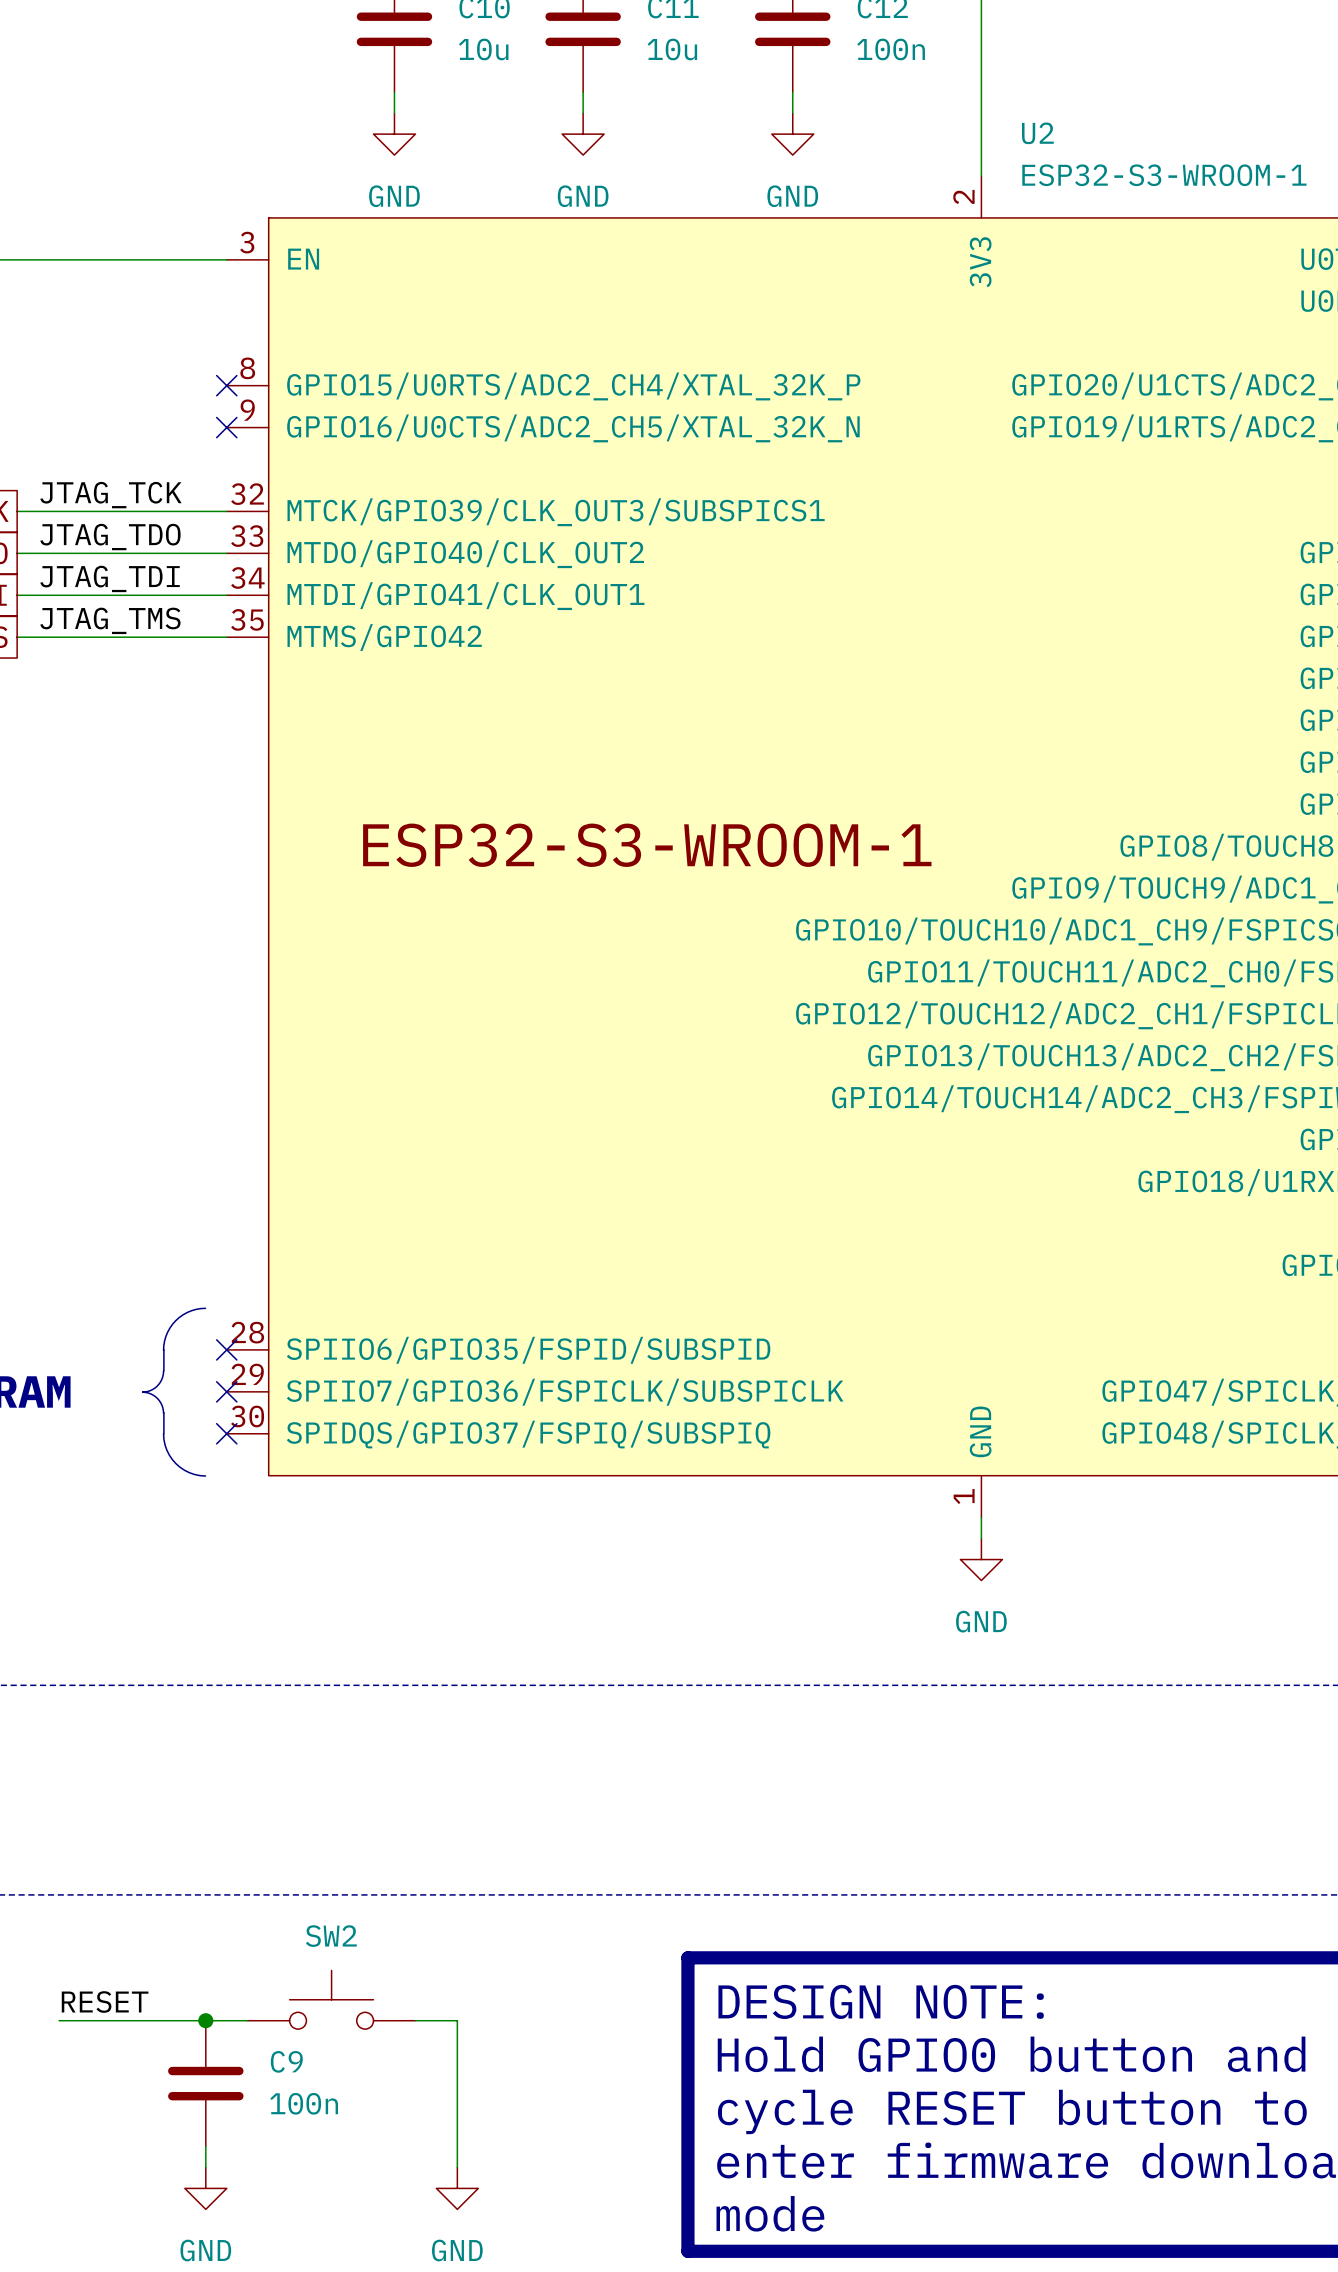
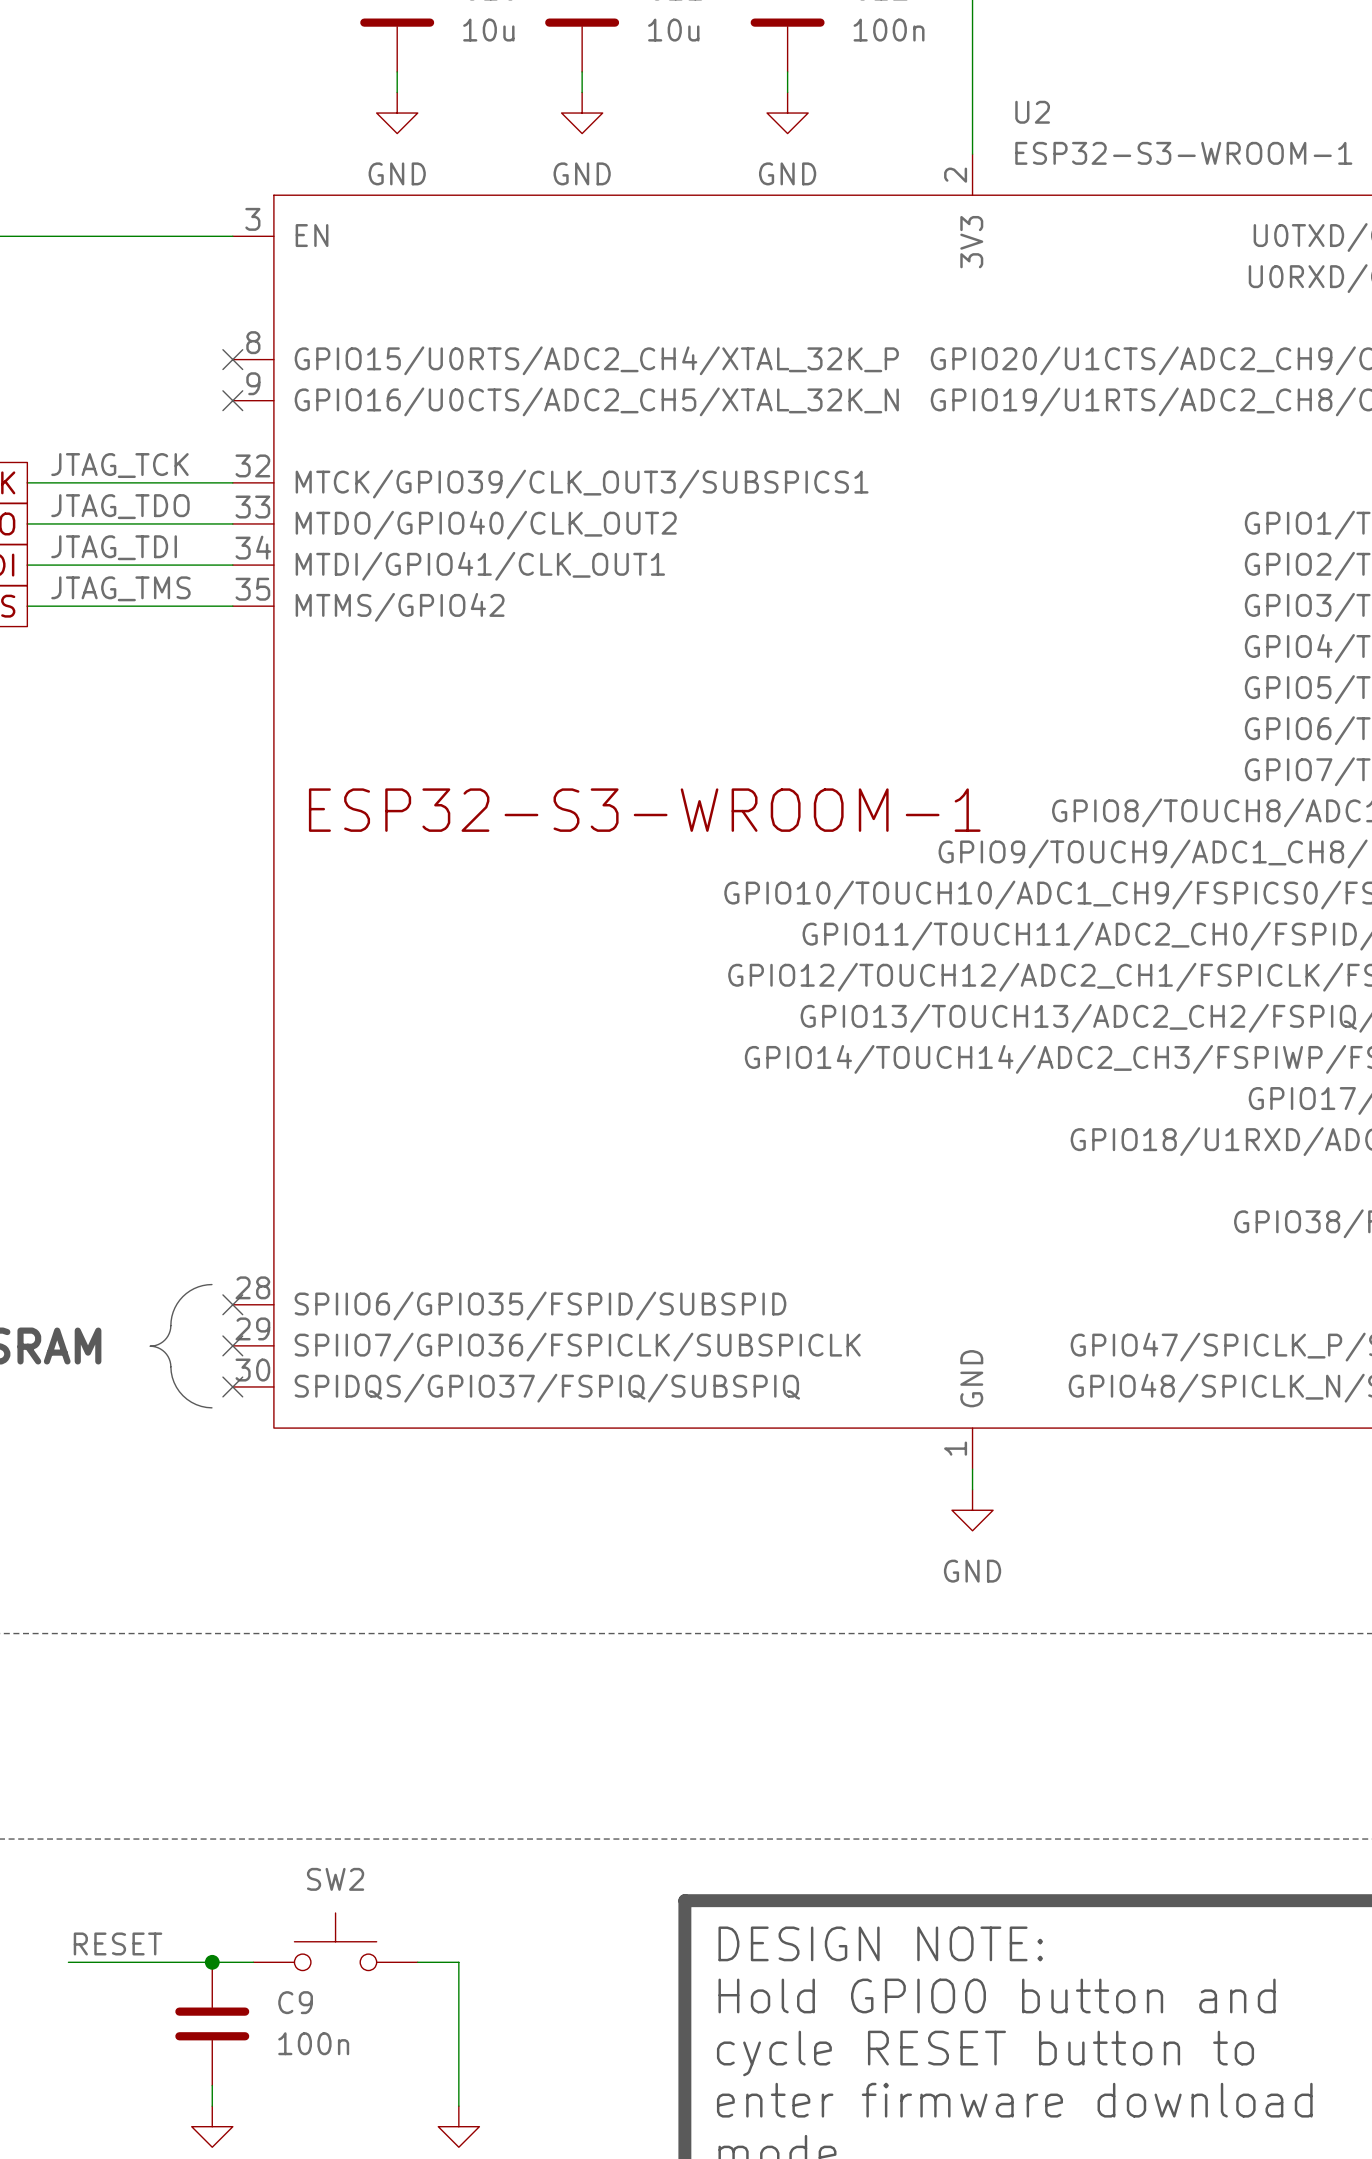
line: (205, 1308) (187, 1312) (175, 1320) (167, 1332) (163, 1350) -> none
line: (163, 1349) (163, 1370) -> (211, 1284) (194, 1288) (182, 1296) (174, 1307) (170, 1325)
line: (163, 1412) (163, 1433) -> (170, 1366) (174, 1382) (182, 1395) (196, 1404) (211, 1407)
line: (163, 1434) (166, 1450) (175, 1463) (189, 1472) (205, 1476) -> none

